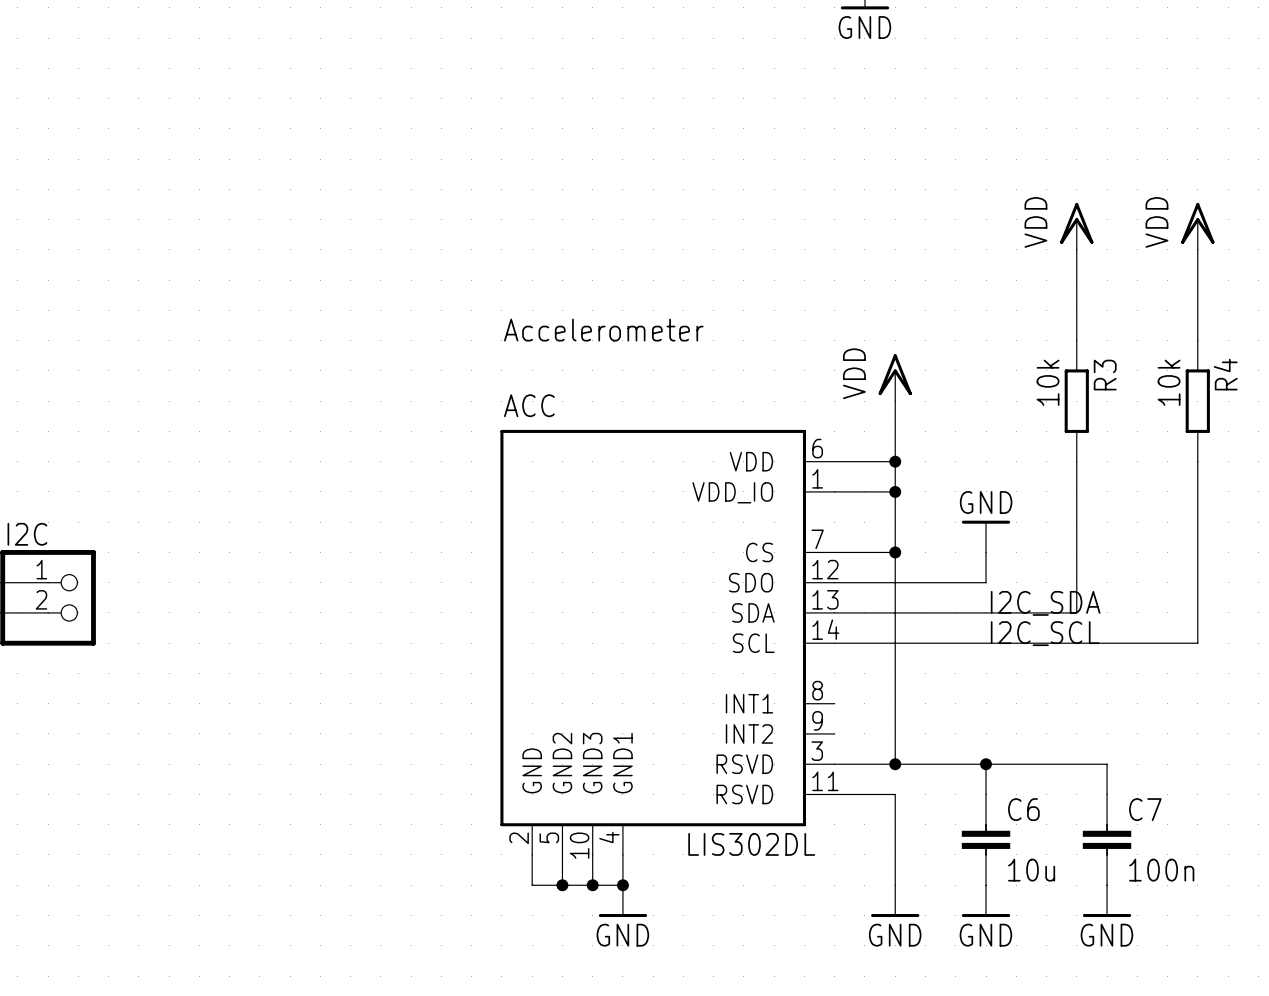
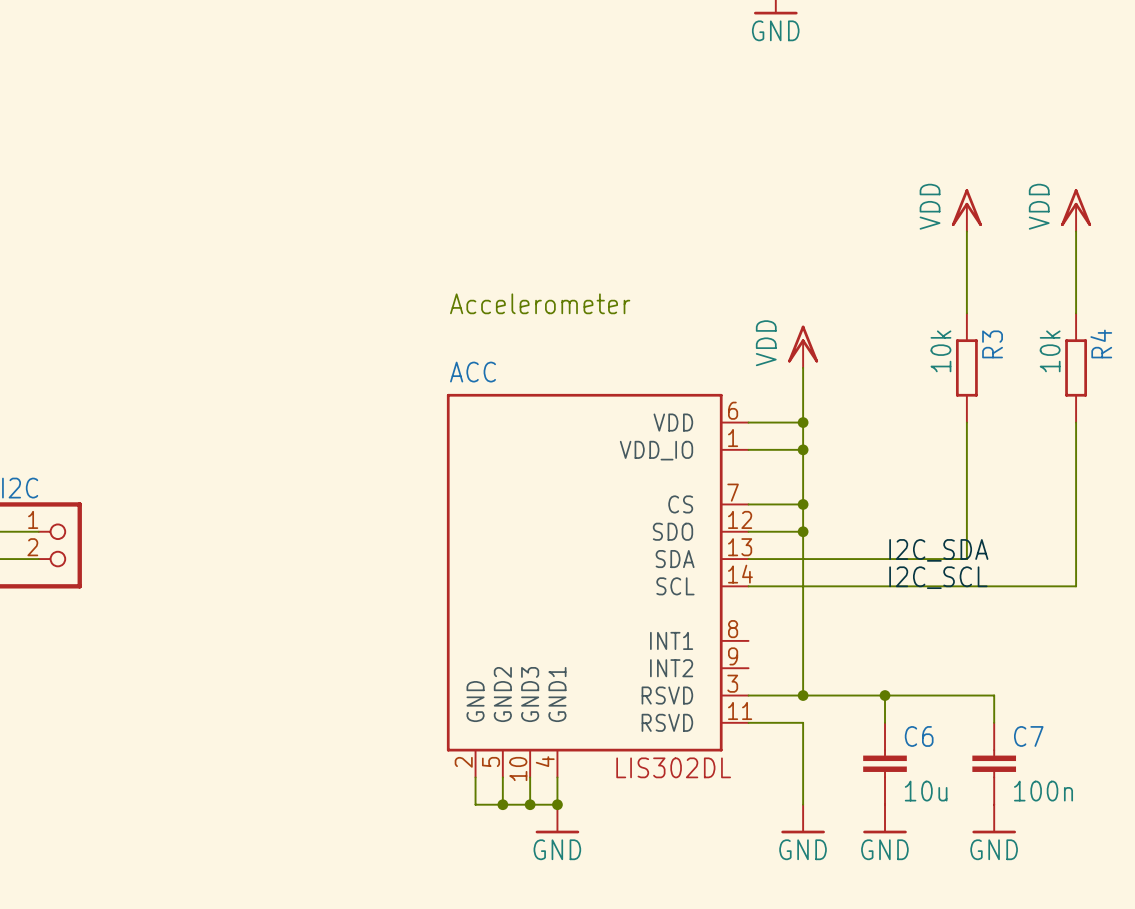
power symbol: GND (986, 536) -> none
wire: (986, 552) (986, 582) (895, 582) -> none
junction: none -> (803, 531)

